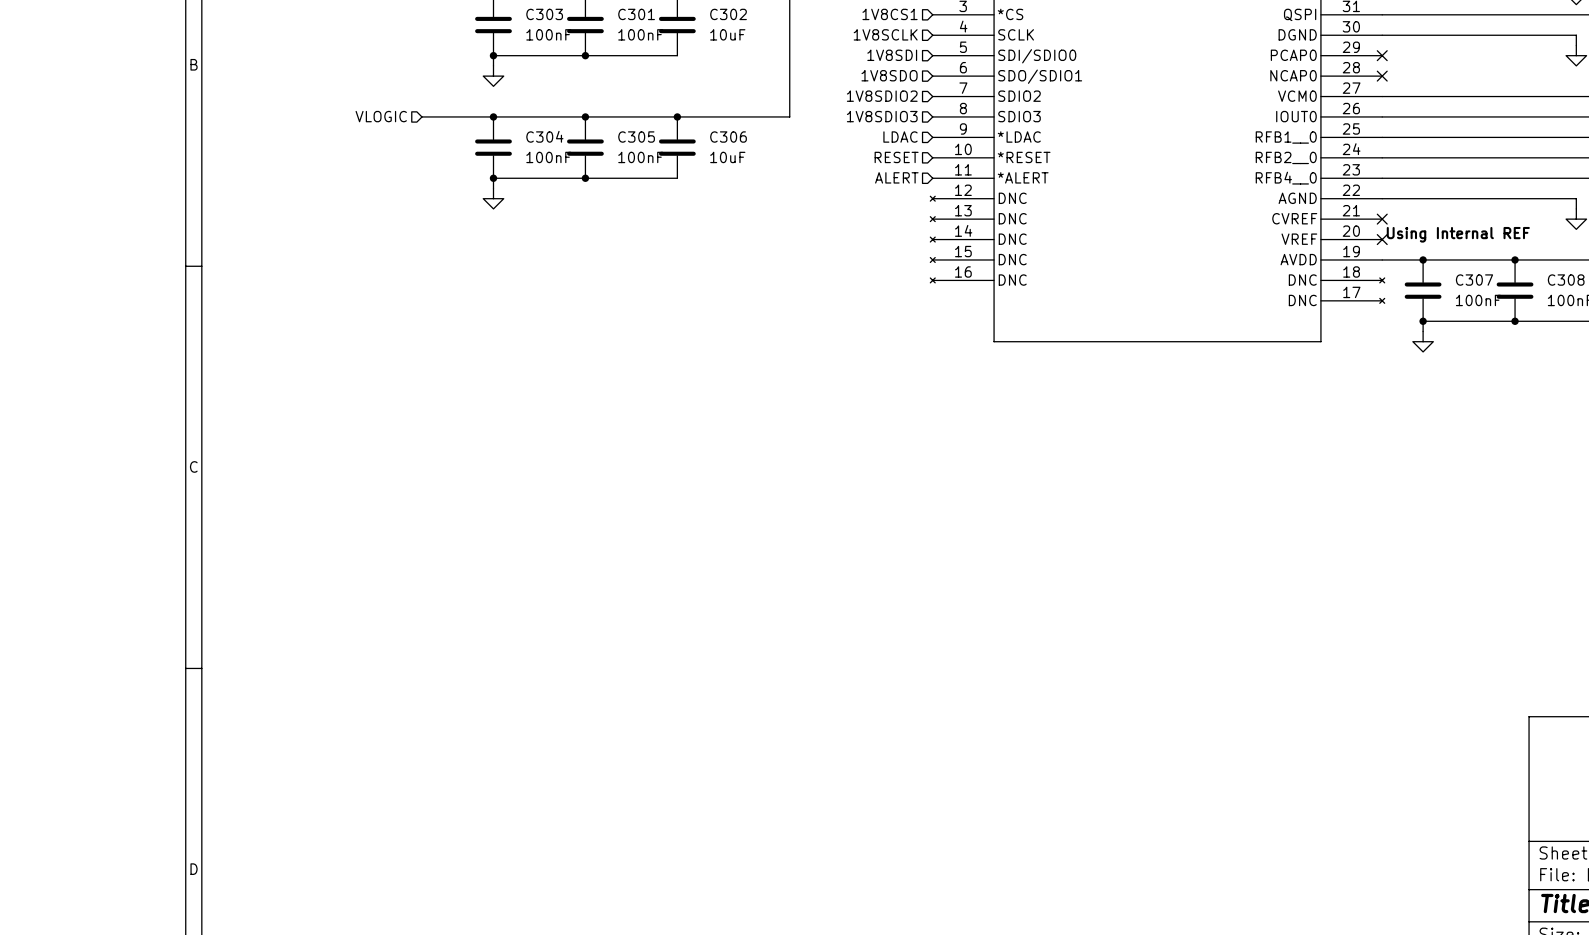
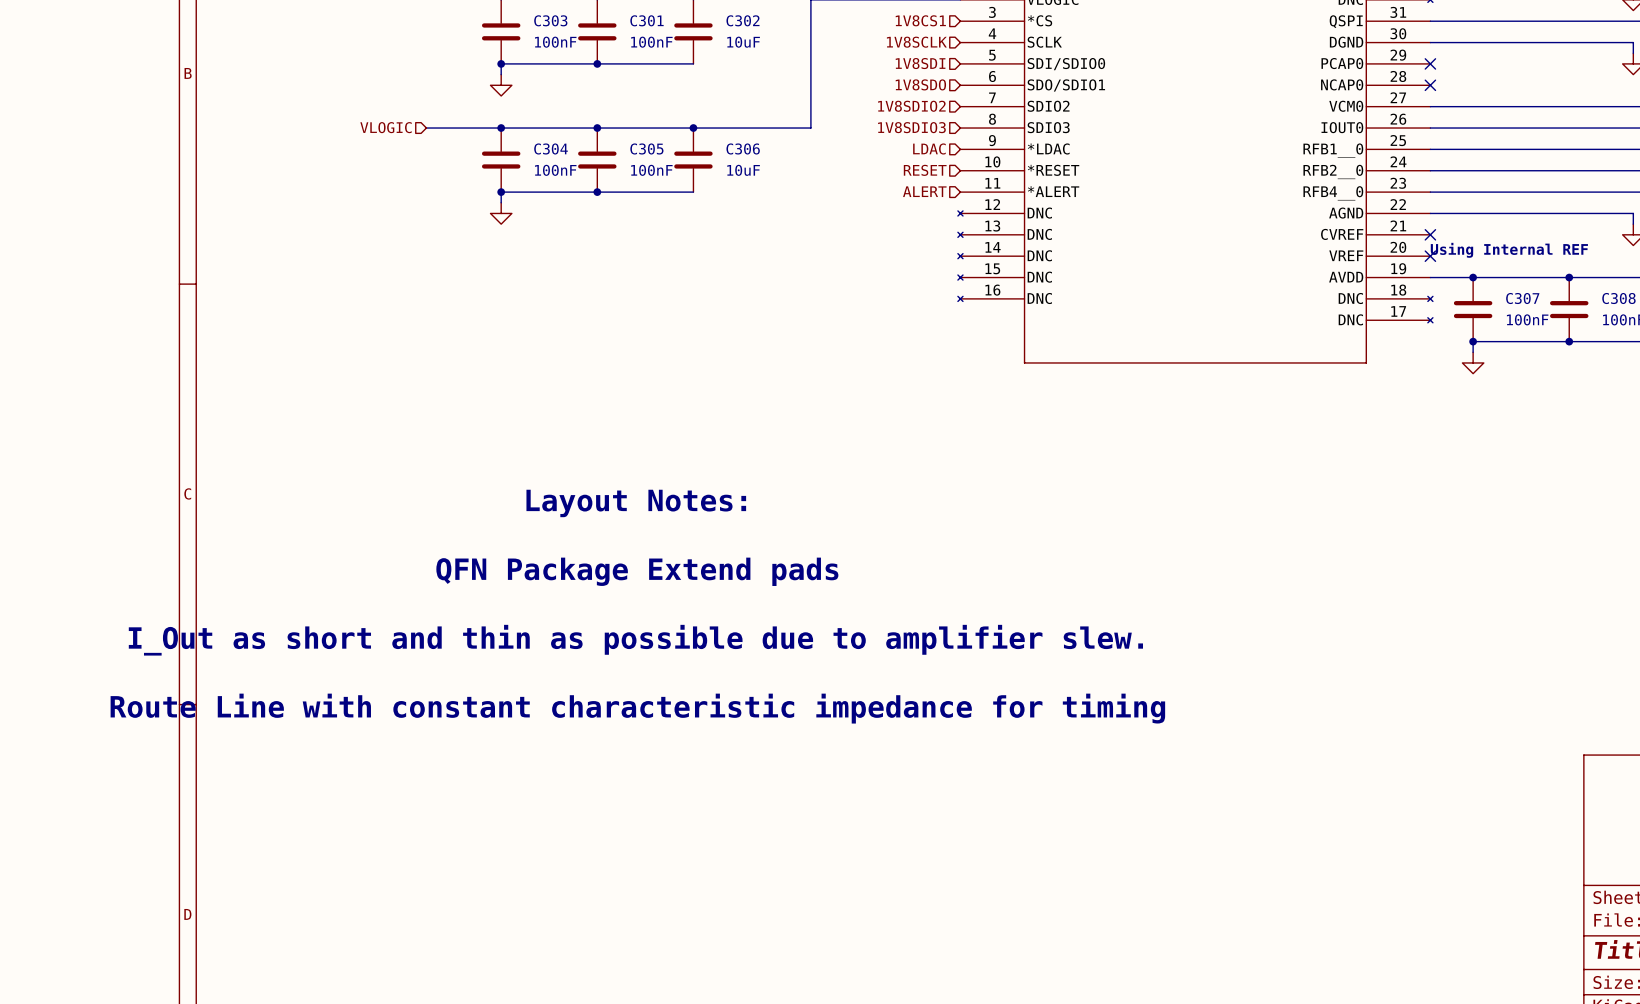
text: none -> Layout Notes: (636, 503)
text: none -> QFN Package Extend pads (637, 571)
text: none -> I_Out as short and thin as possible due to amplifier slew. (635, 640)
text: none -> Route Line with constant characteristic impedance for timing (637, 708)

